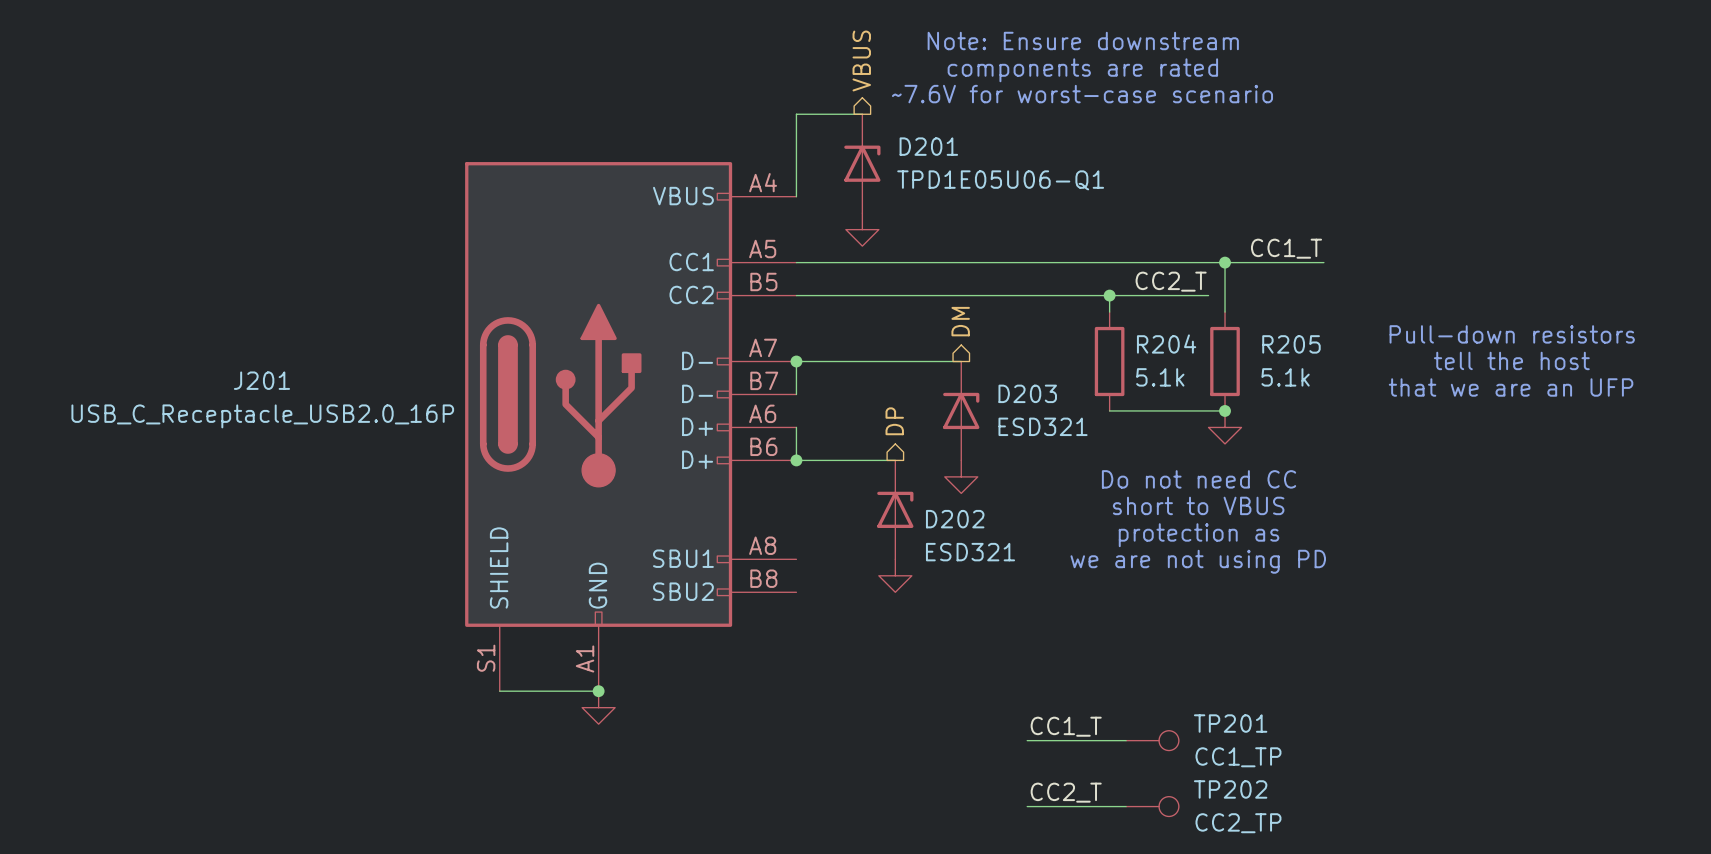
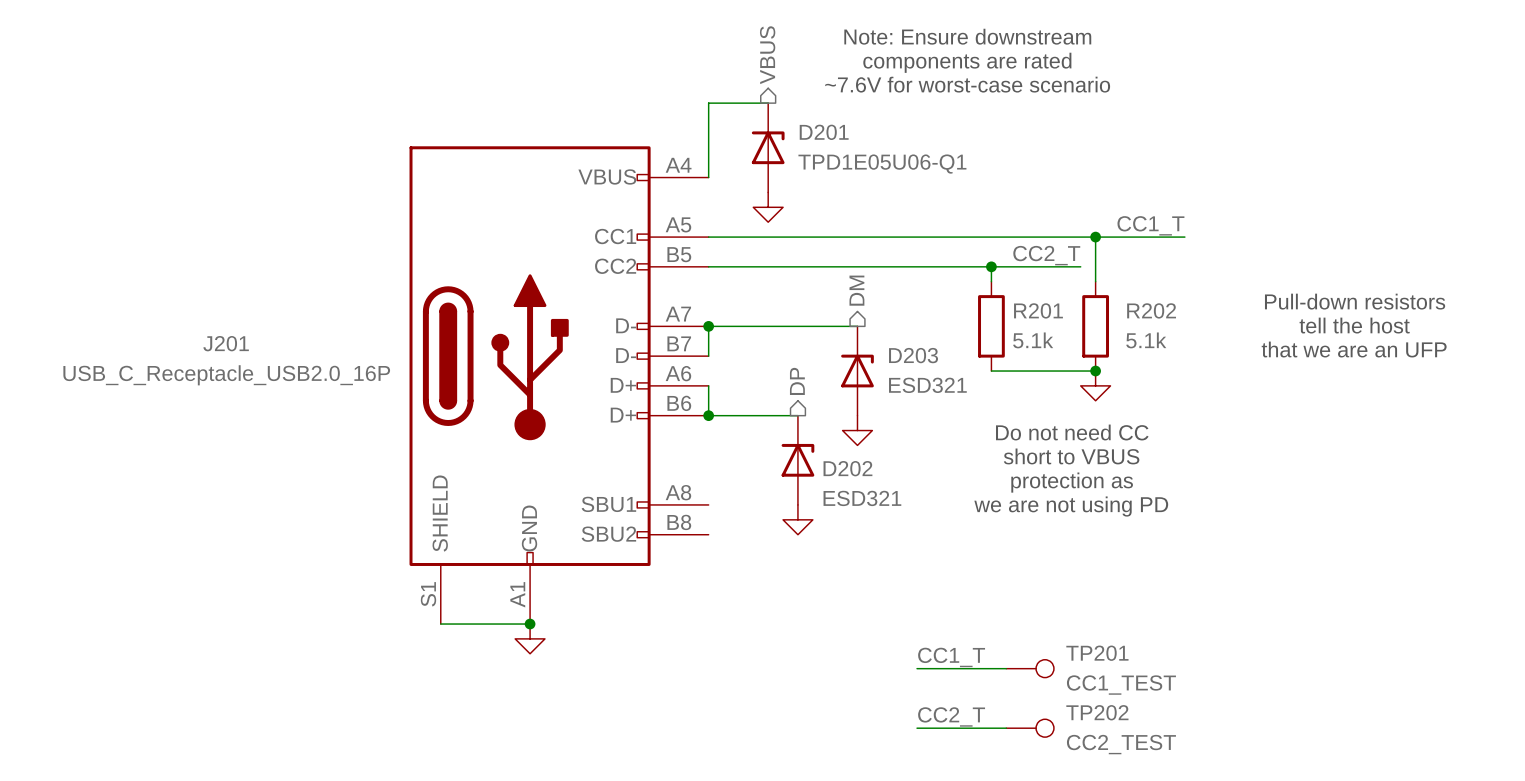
R204 name: R204 (1166, 344) -> R201 (1038, 310)
R205 name: R205 (1291, 344) -> R202 (1151, 310)
TP201 value: CC1_TP (1238, 757) -> CC1_TEST (1121, 685)
TP202 value: CC2_TP (1238, 823) -> CC2_TEST (1121, 744)

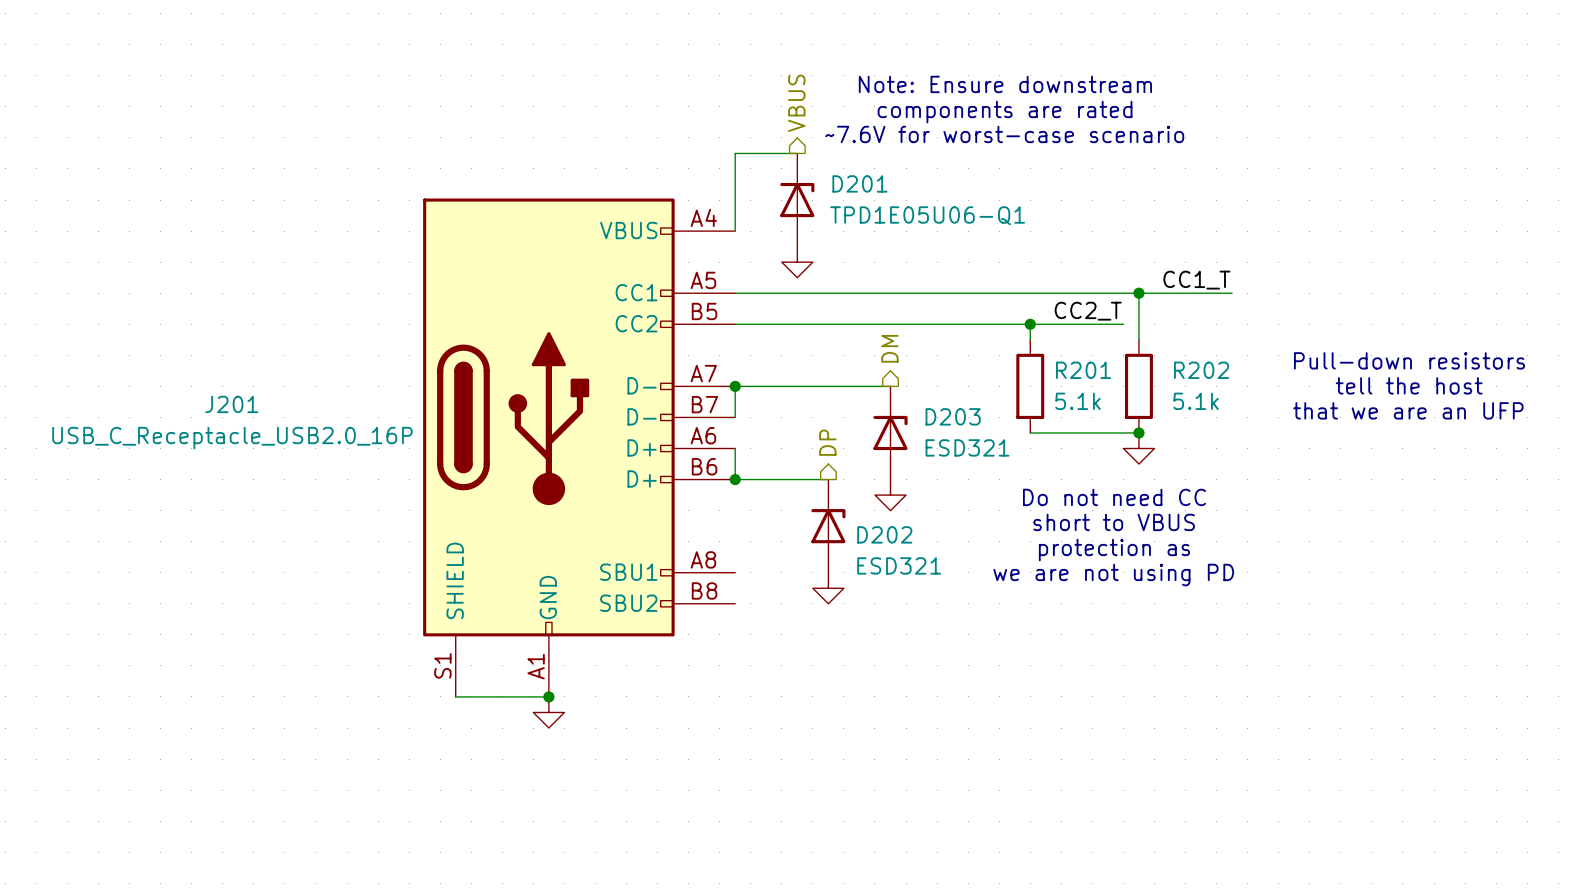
label: CC1_T (951, 657) -> none
wire: (917, 668) (1006, 668) -> none
TP201: CC1_TEST (1030, 668) -> none
label: CC2_T (951, 716) -> none
wire: (917, 728) (1006, 728) -> none
TP202: CC2_TEST (1030, 728) -> none

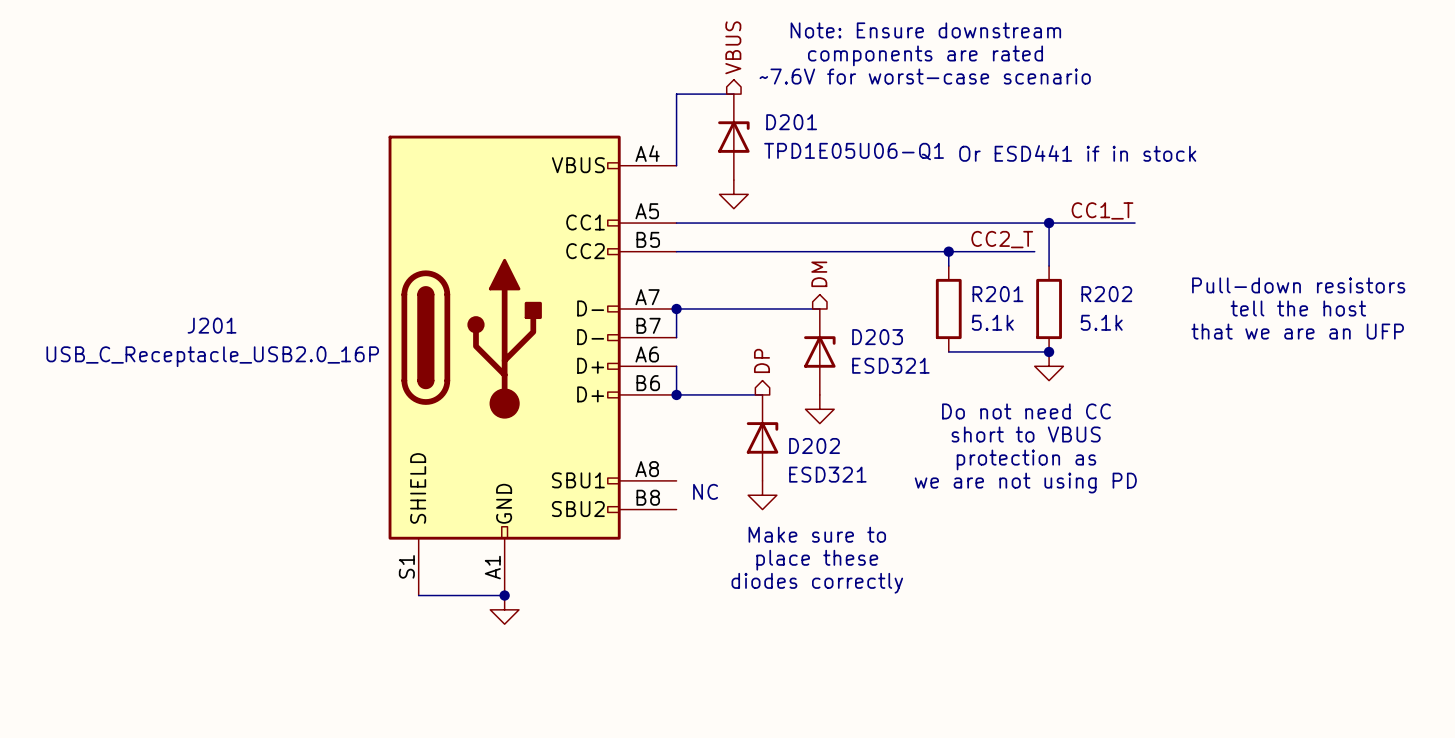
text: none -> Or ESD441 if in stock (1077, 153)
text: none -> NC (705, 491)
text: none -> Make sure to (817, 534)
text: none -> place these (817, 560)
text: none -> diodes correctly (817, 583)

